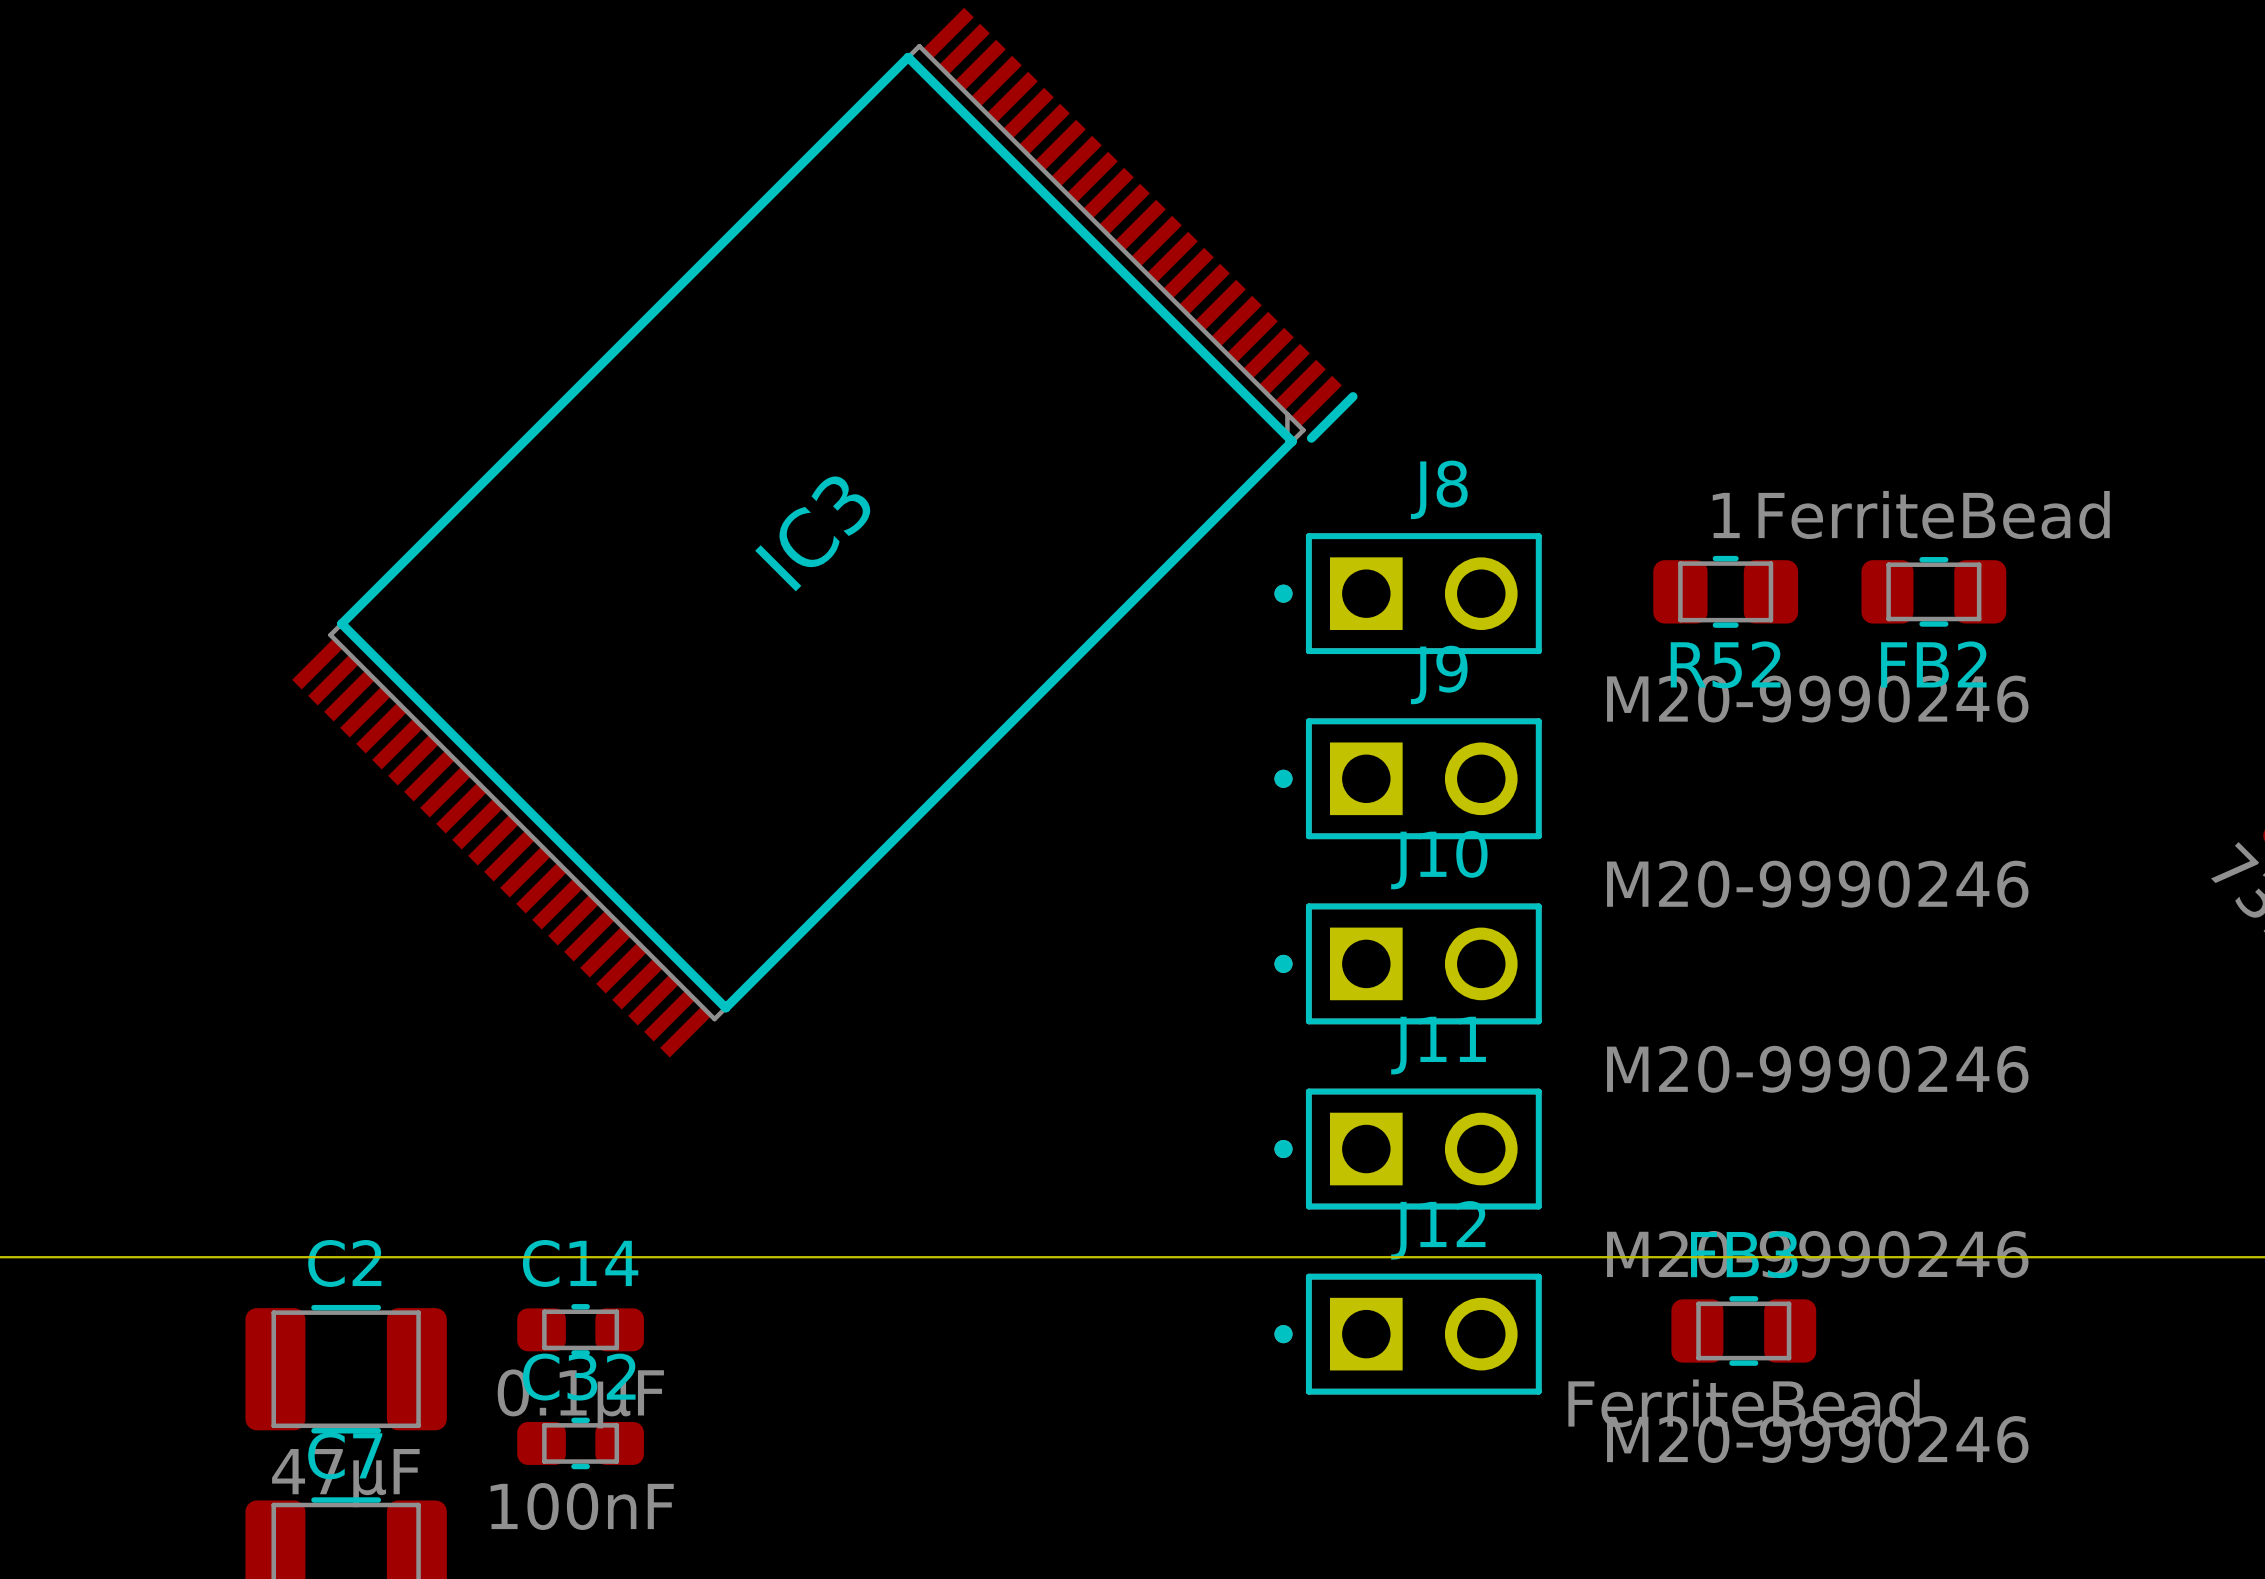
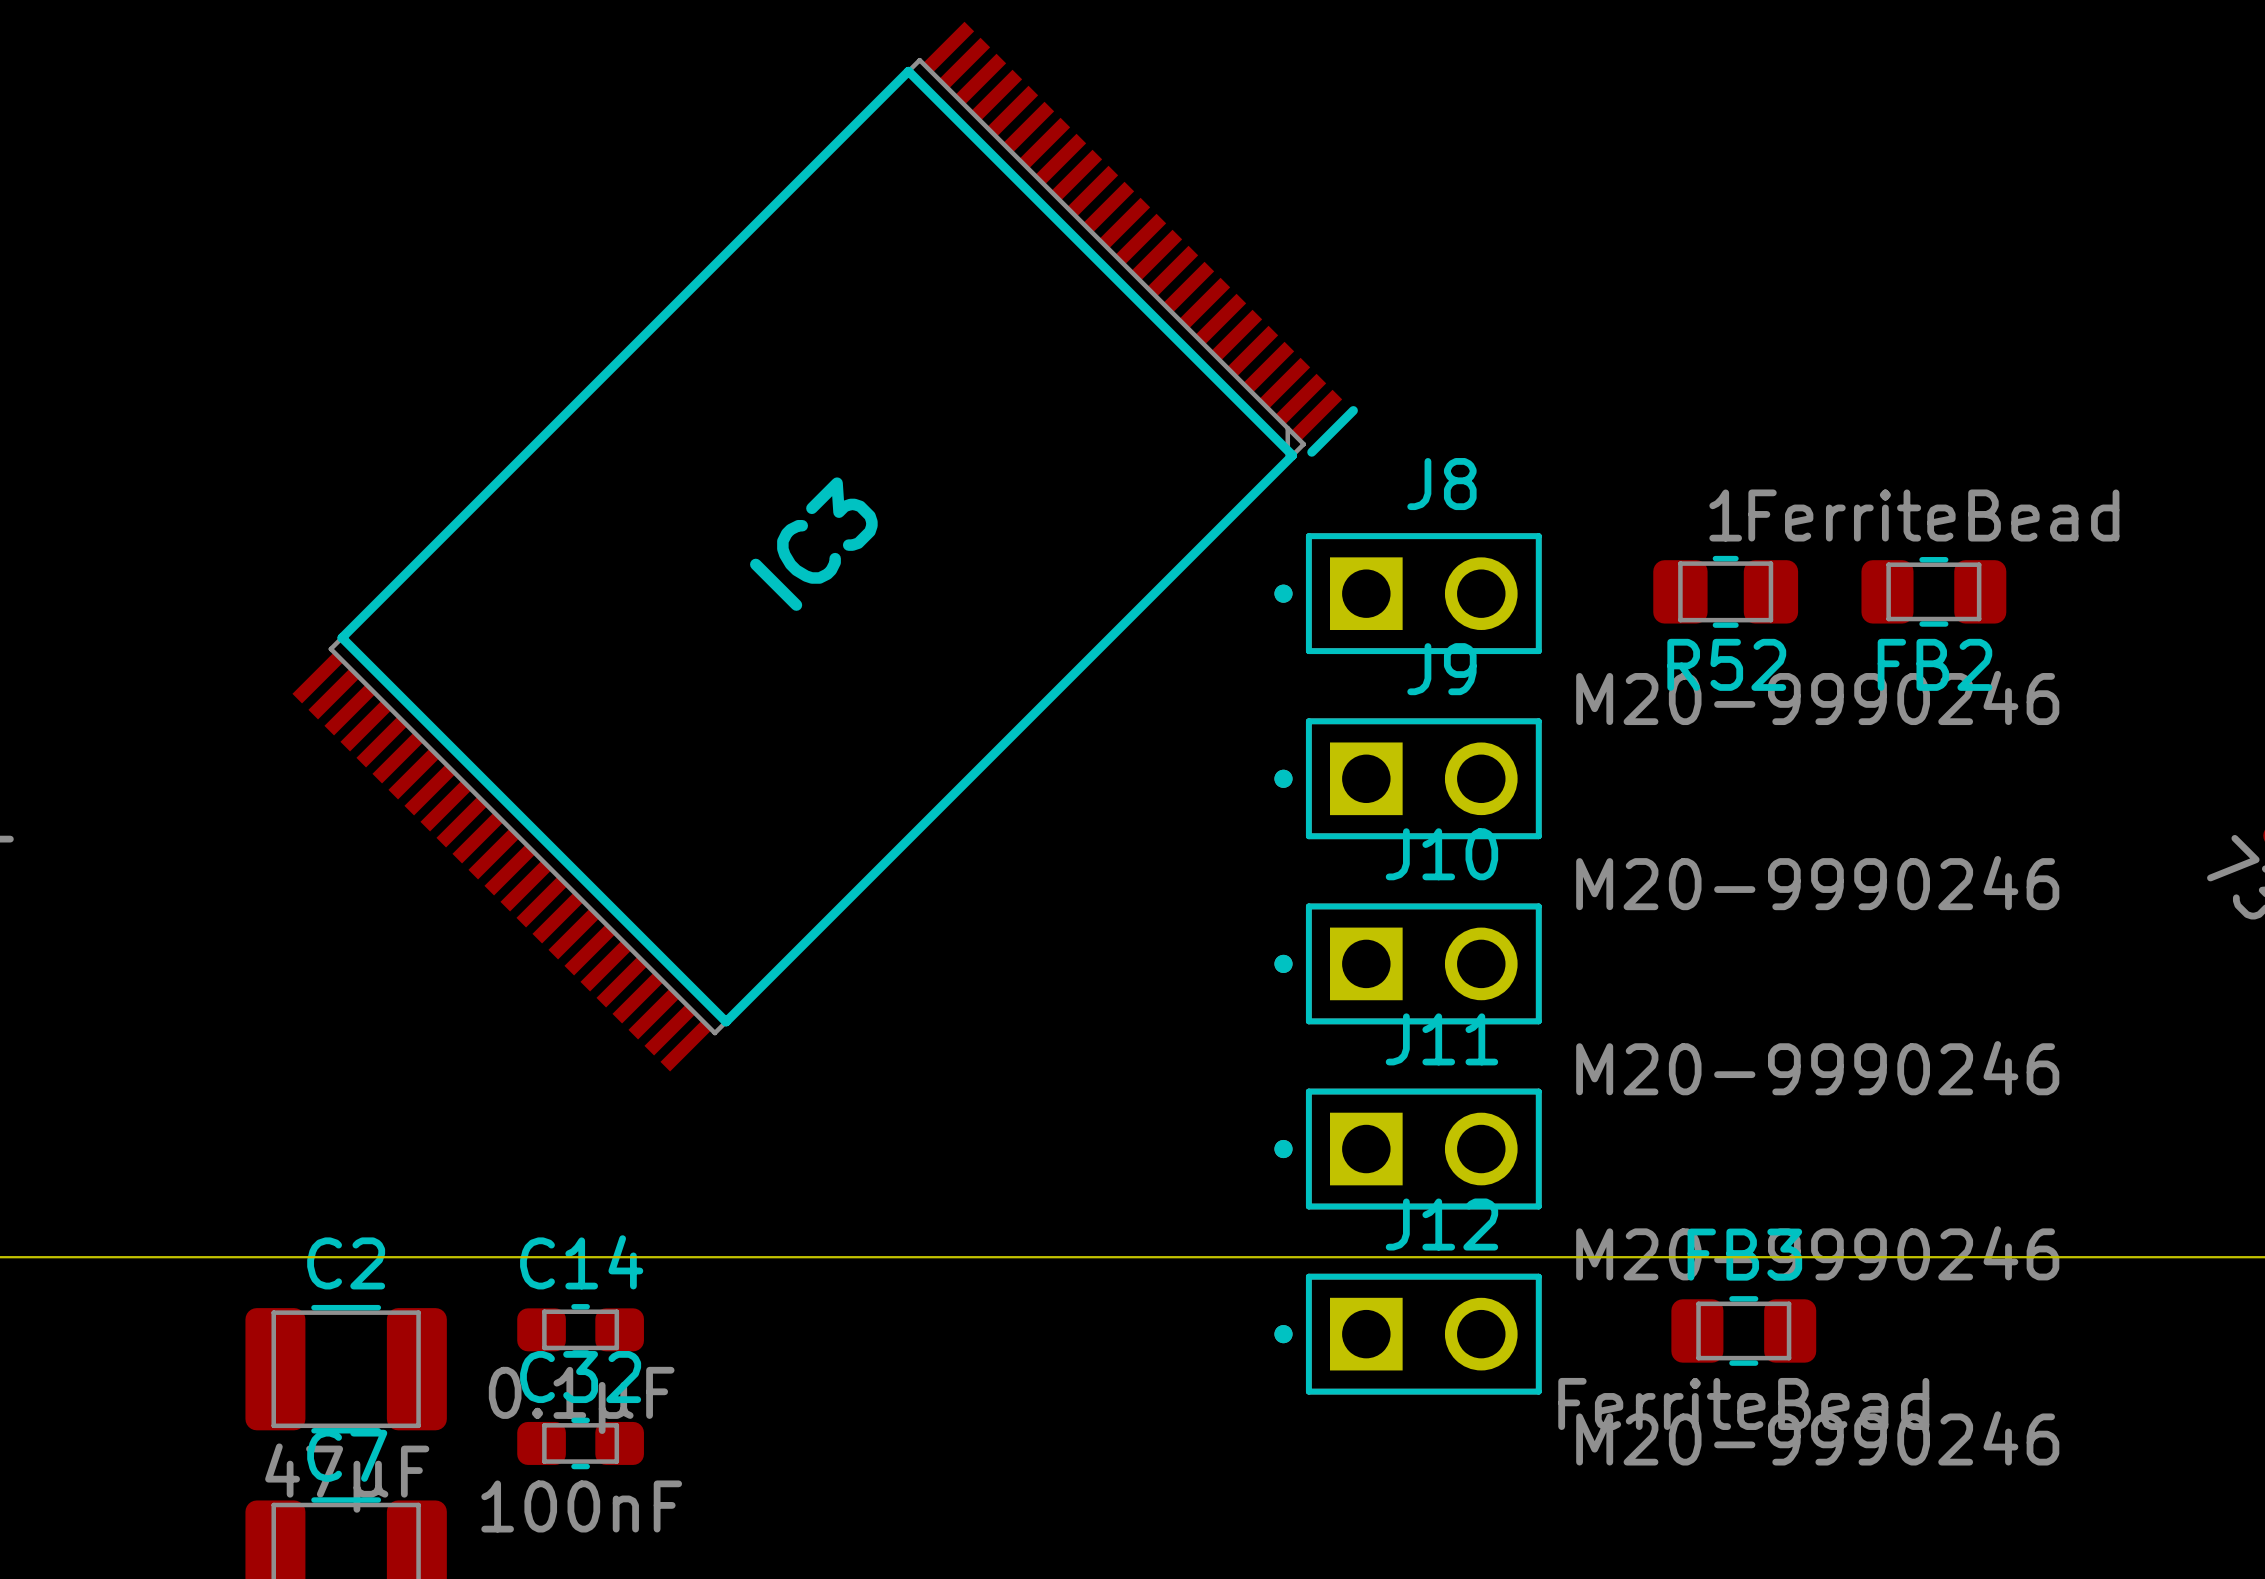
IC3 position: (824, 532) -> (825, 546)

